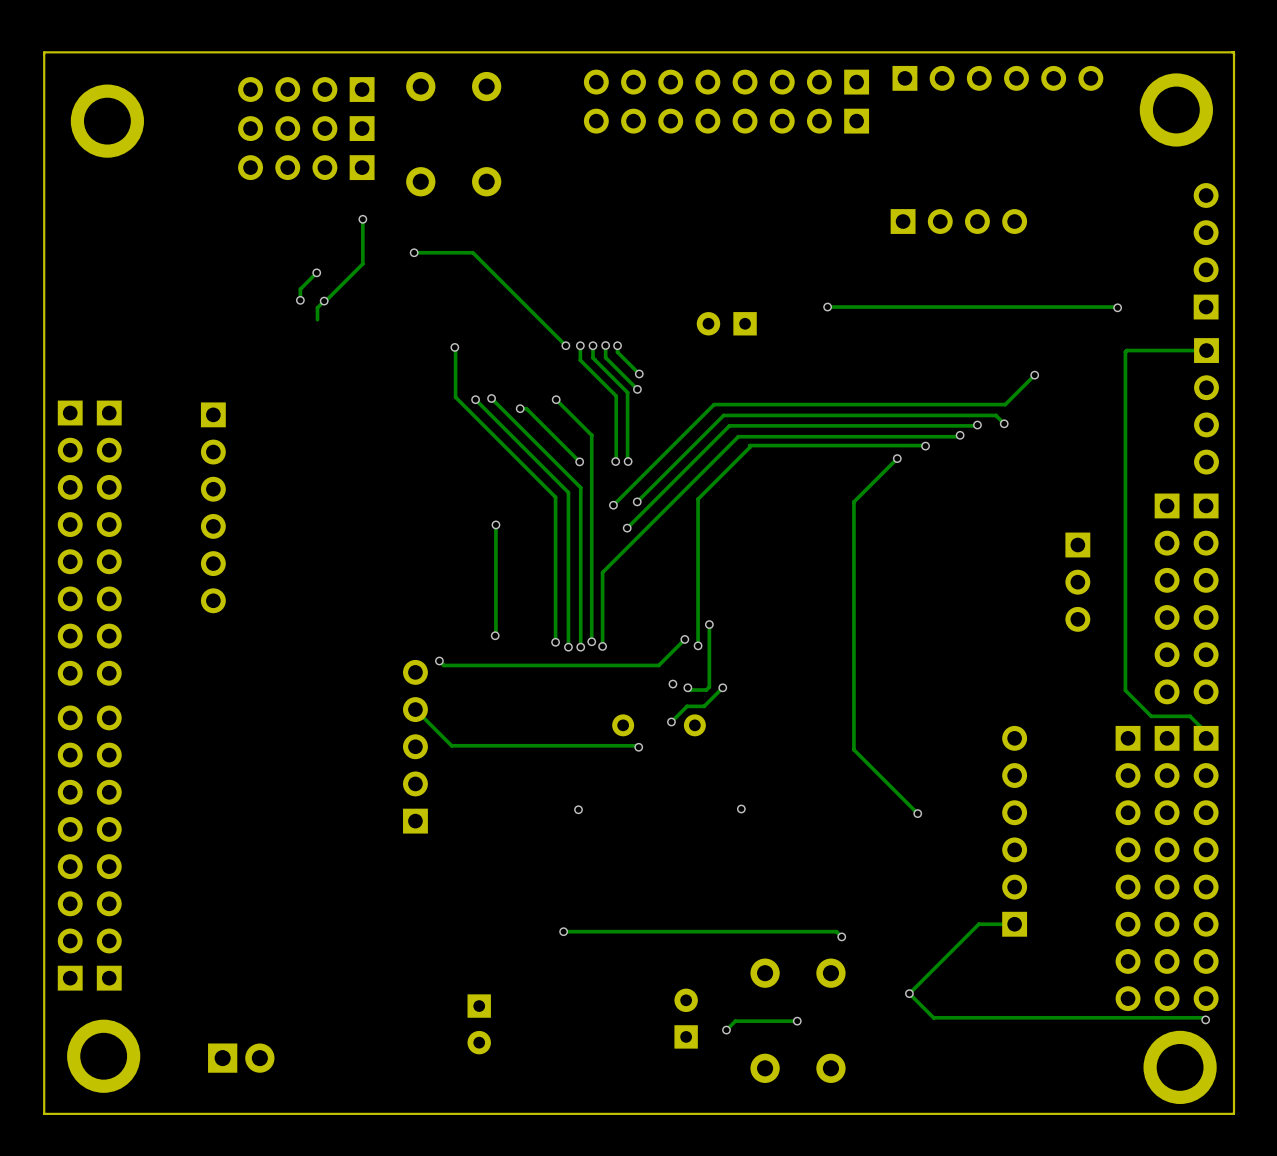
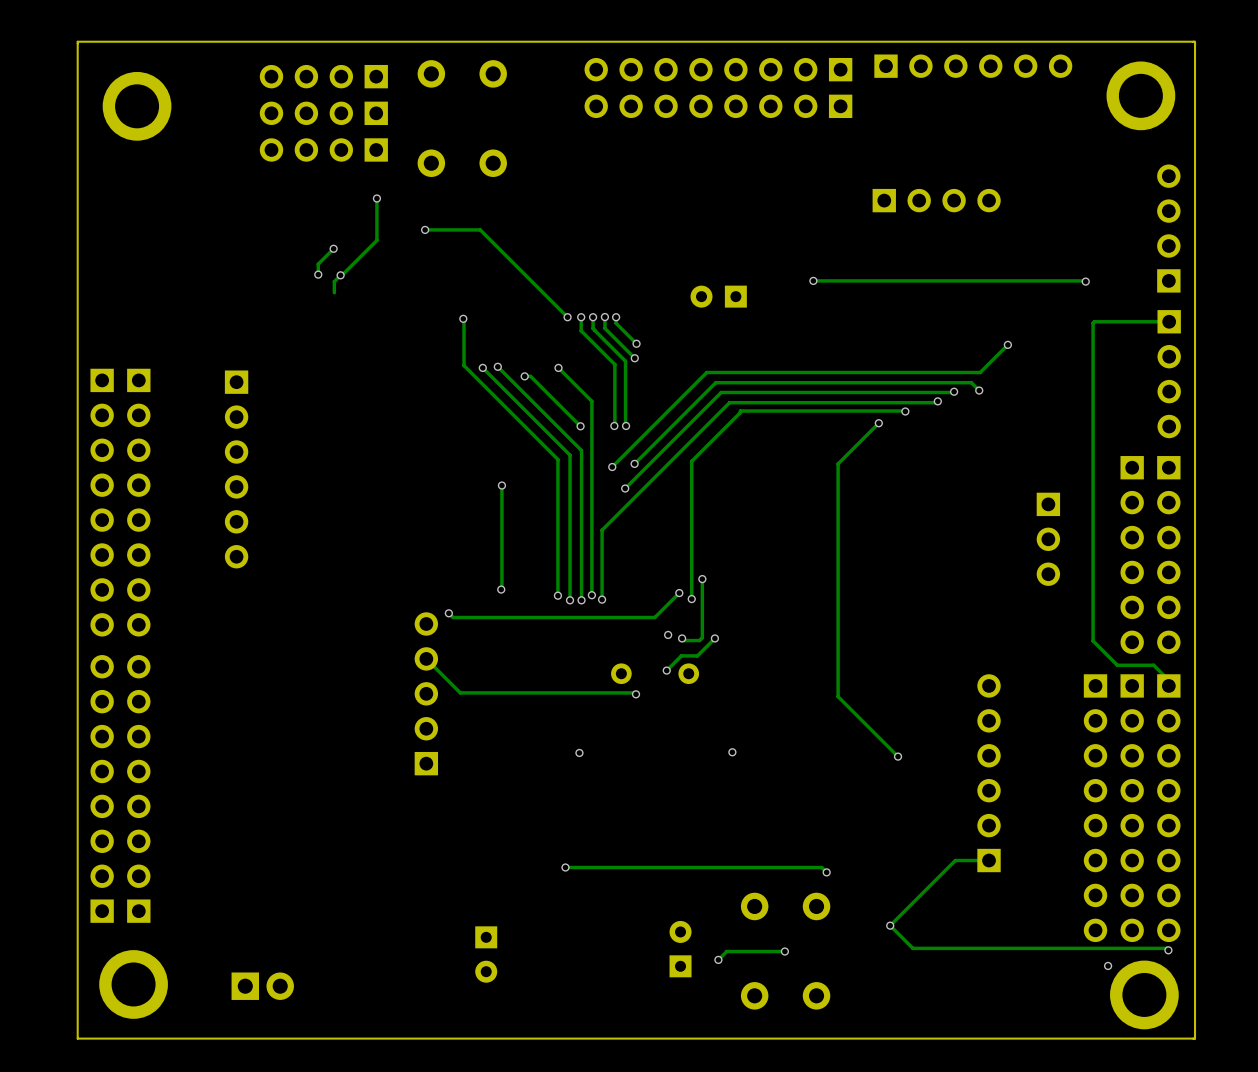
via: none -> (1108, 965)

